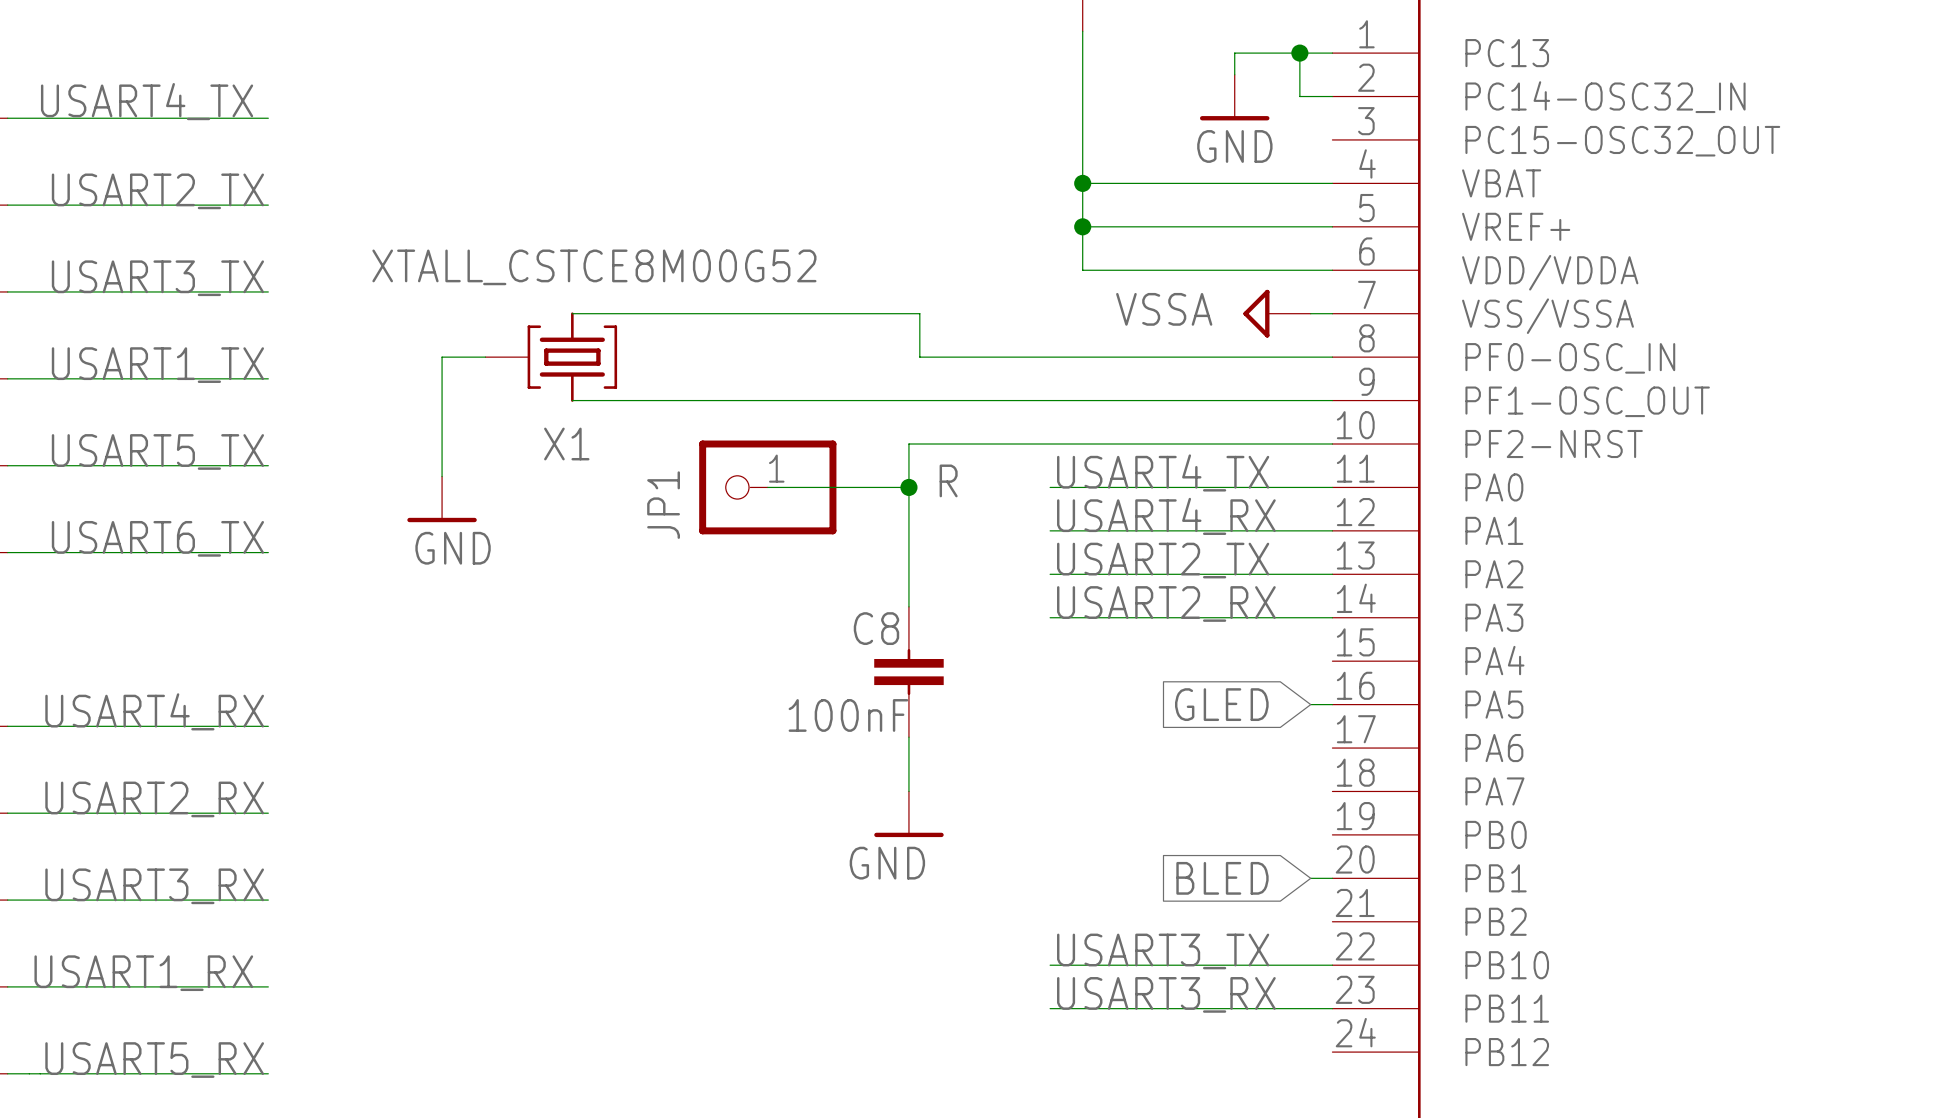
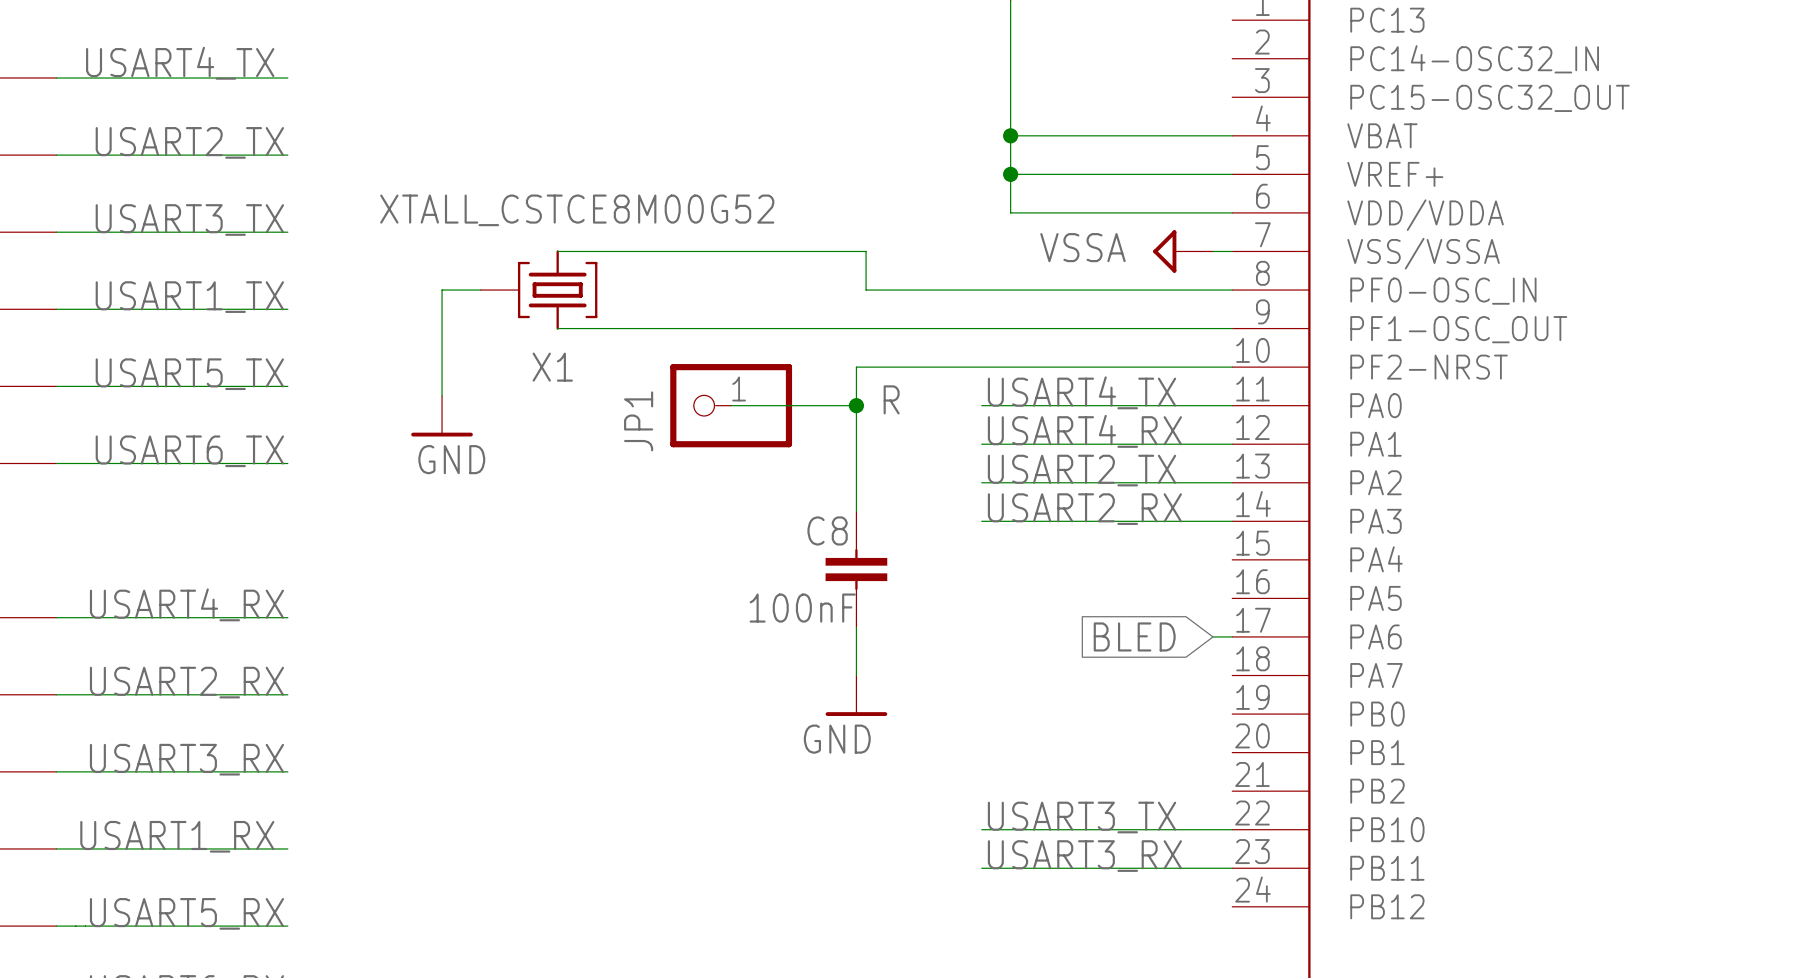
wire: (1299, 53) (1299, 96) (1332, 96) -> none
junction: (1299, 53) -> none
wire: (1332, 53) (1234, 53) (1234, 74) -> none
power symbol: GND (1234, 97) -> none
global label: GLED (1221, 704) -> none
wire: (1310, 704) (1332, 704) -> (1213, 636) (1232, 636)
global label position: BLED (1222, 878) -> BLED (1134, 636)
wire: (1310, 878) (1332, 878) -> none

